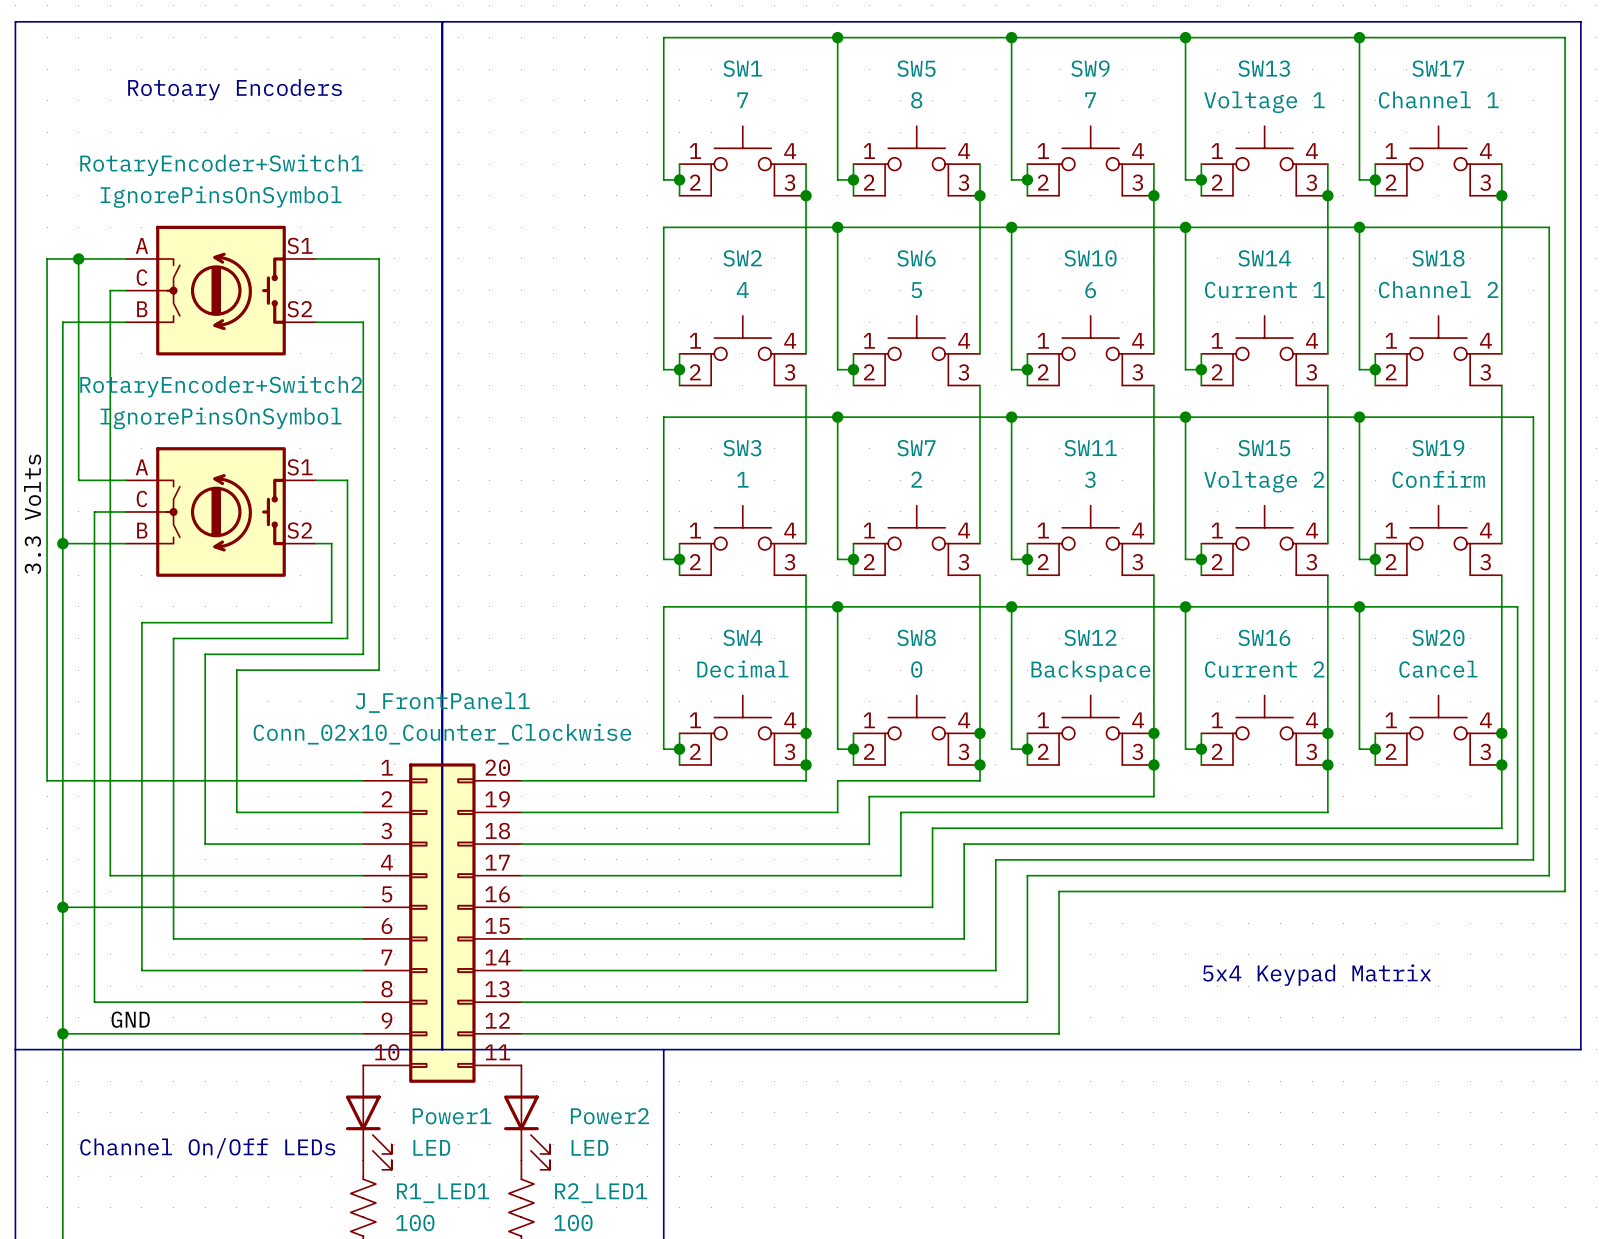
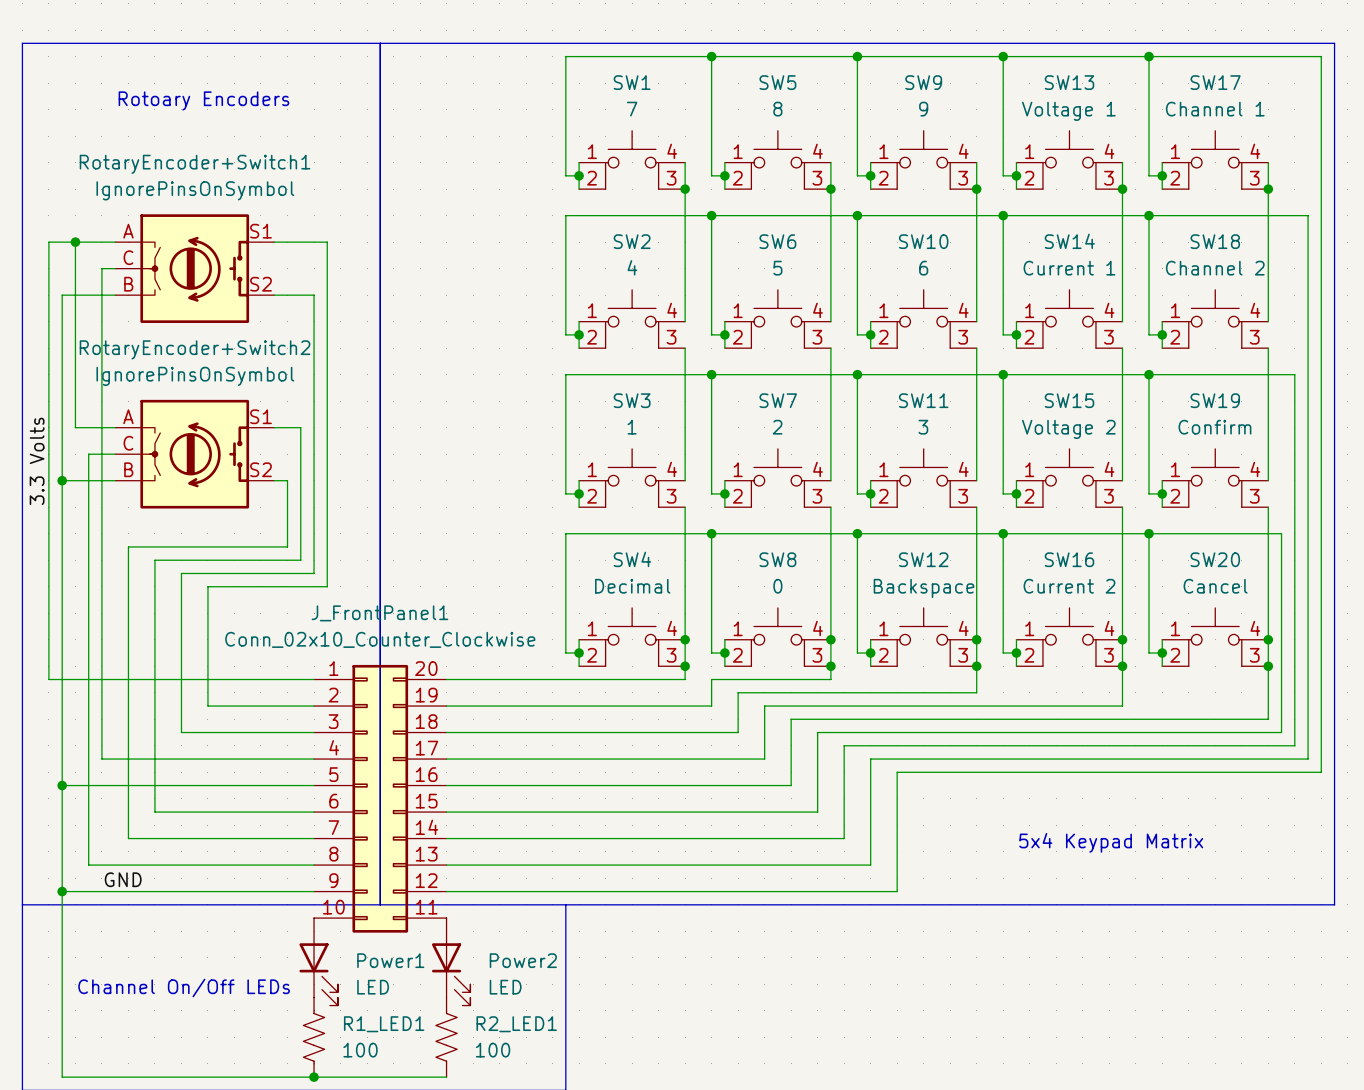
SW9 value: 7 (1090, 100) -> 9 (923, 109)

